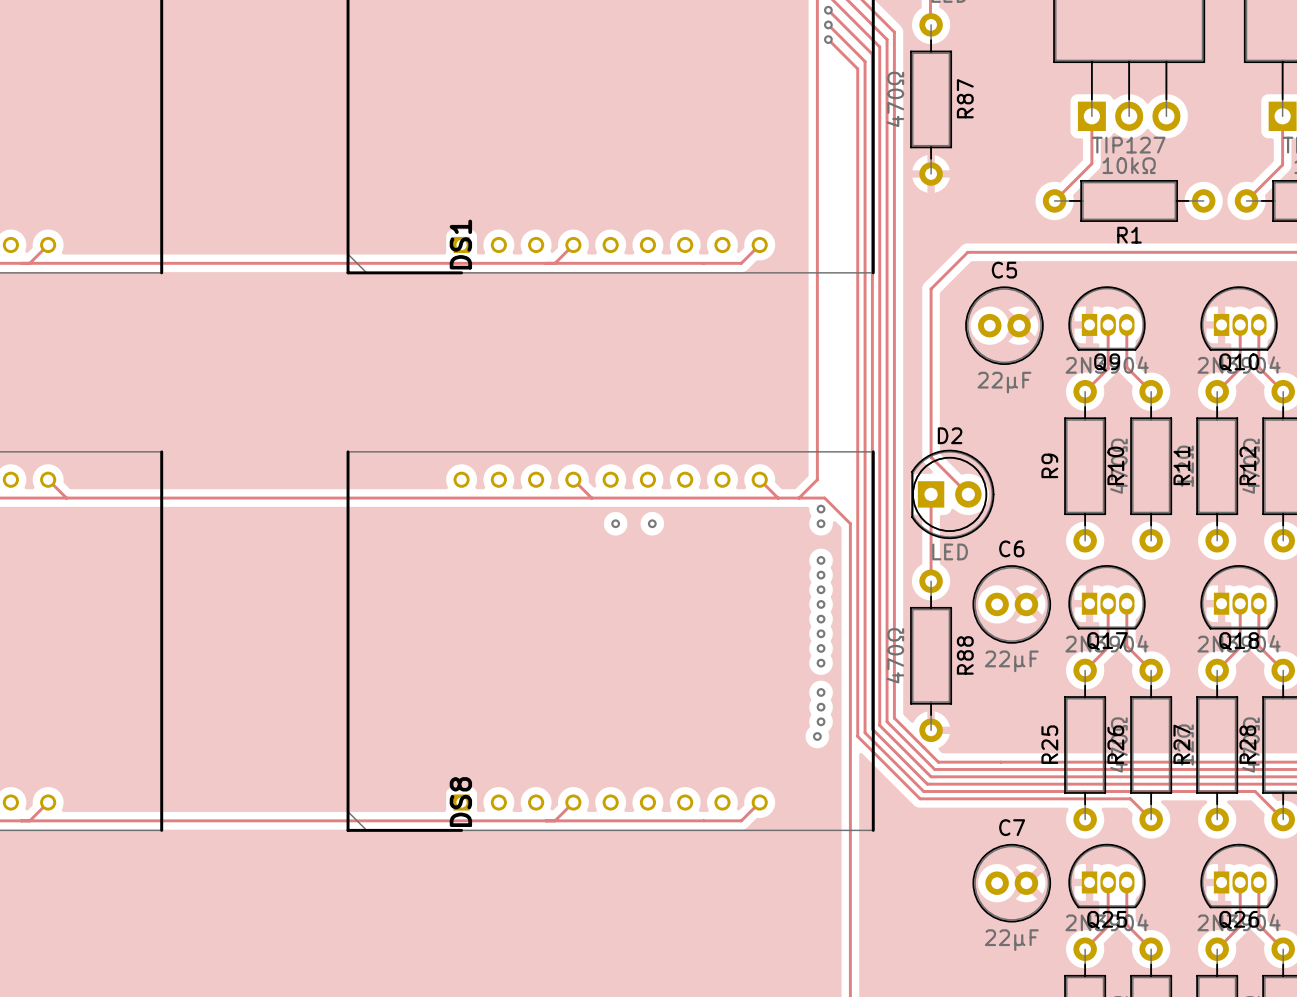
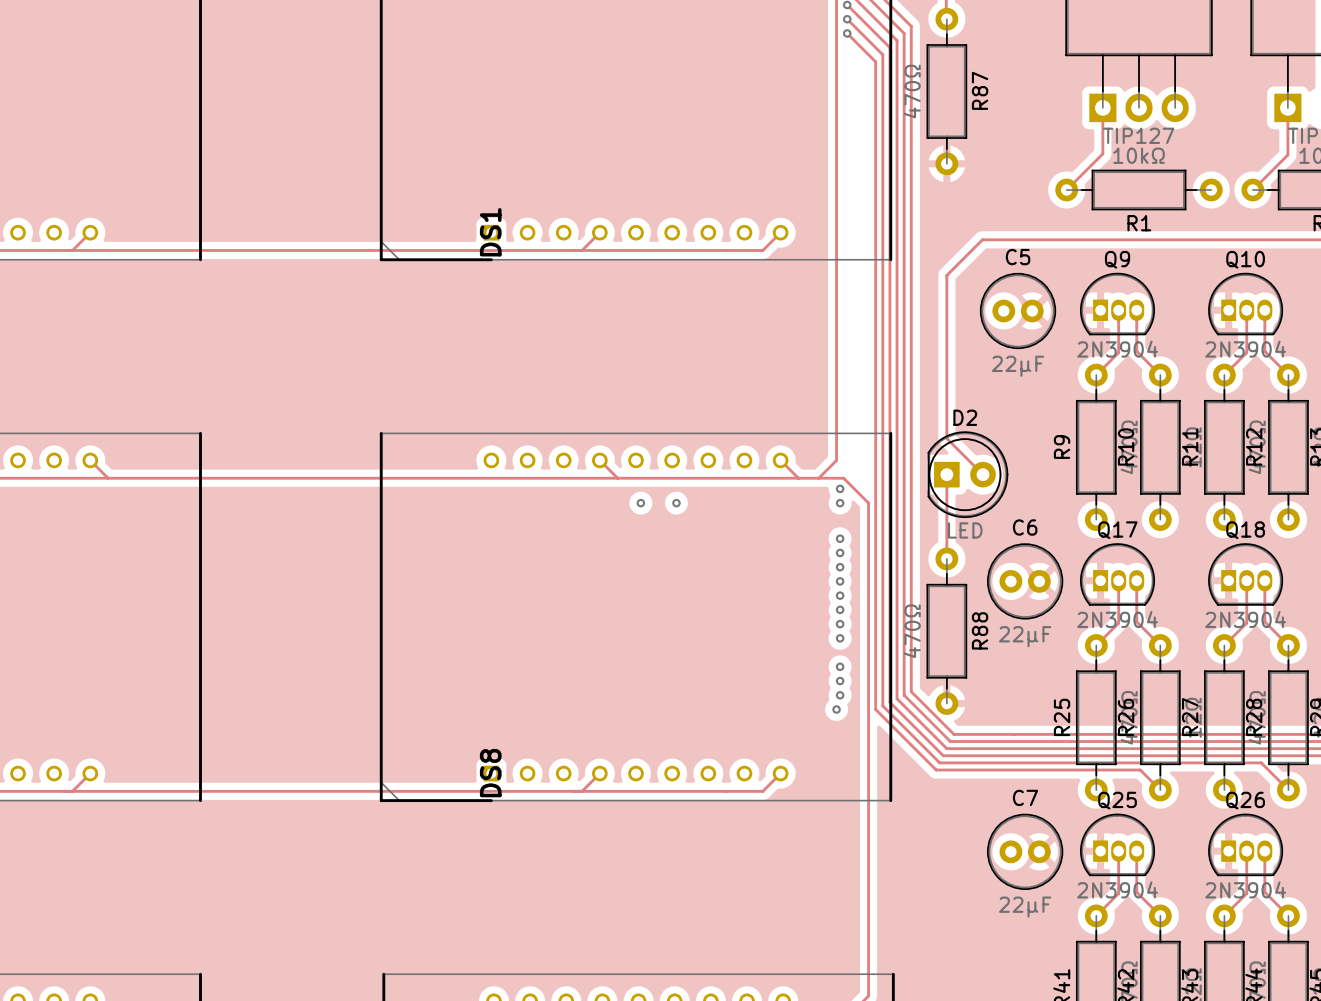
Q9 name position: Q9 (1107, 362) -> Q9 (1117, 259)
Q10 name position: Q10 (1239, 362) -> Q10 (1245, 259)
Q17 name position: Q17 (1107, 641) -> Q17 (1117, 530)
Q18 name position: Q18 (1239, 641) -> Q18 (1245, 530)
Q25 name position: Q25 (1107, 920) -> Q25 (1117, 800)
Q26 name position: Q26 (1239, 920) -> Q26 (1245, 800)

